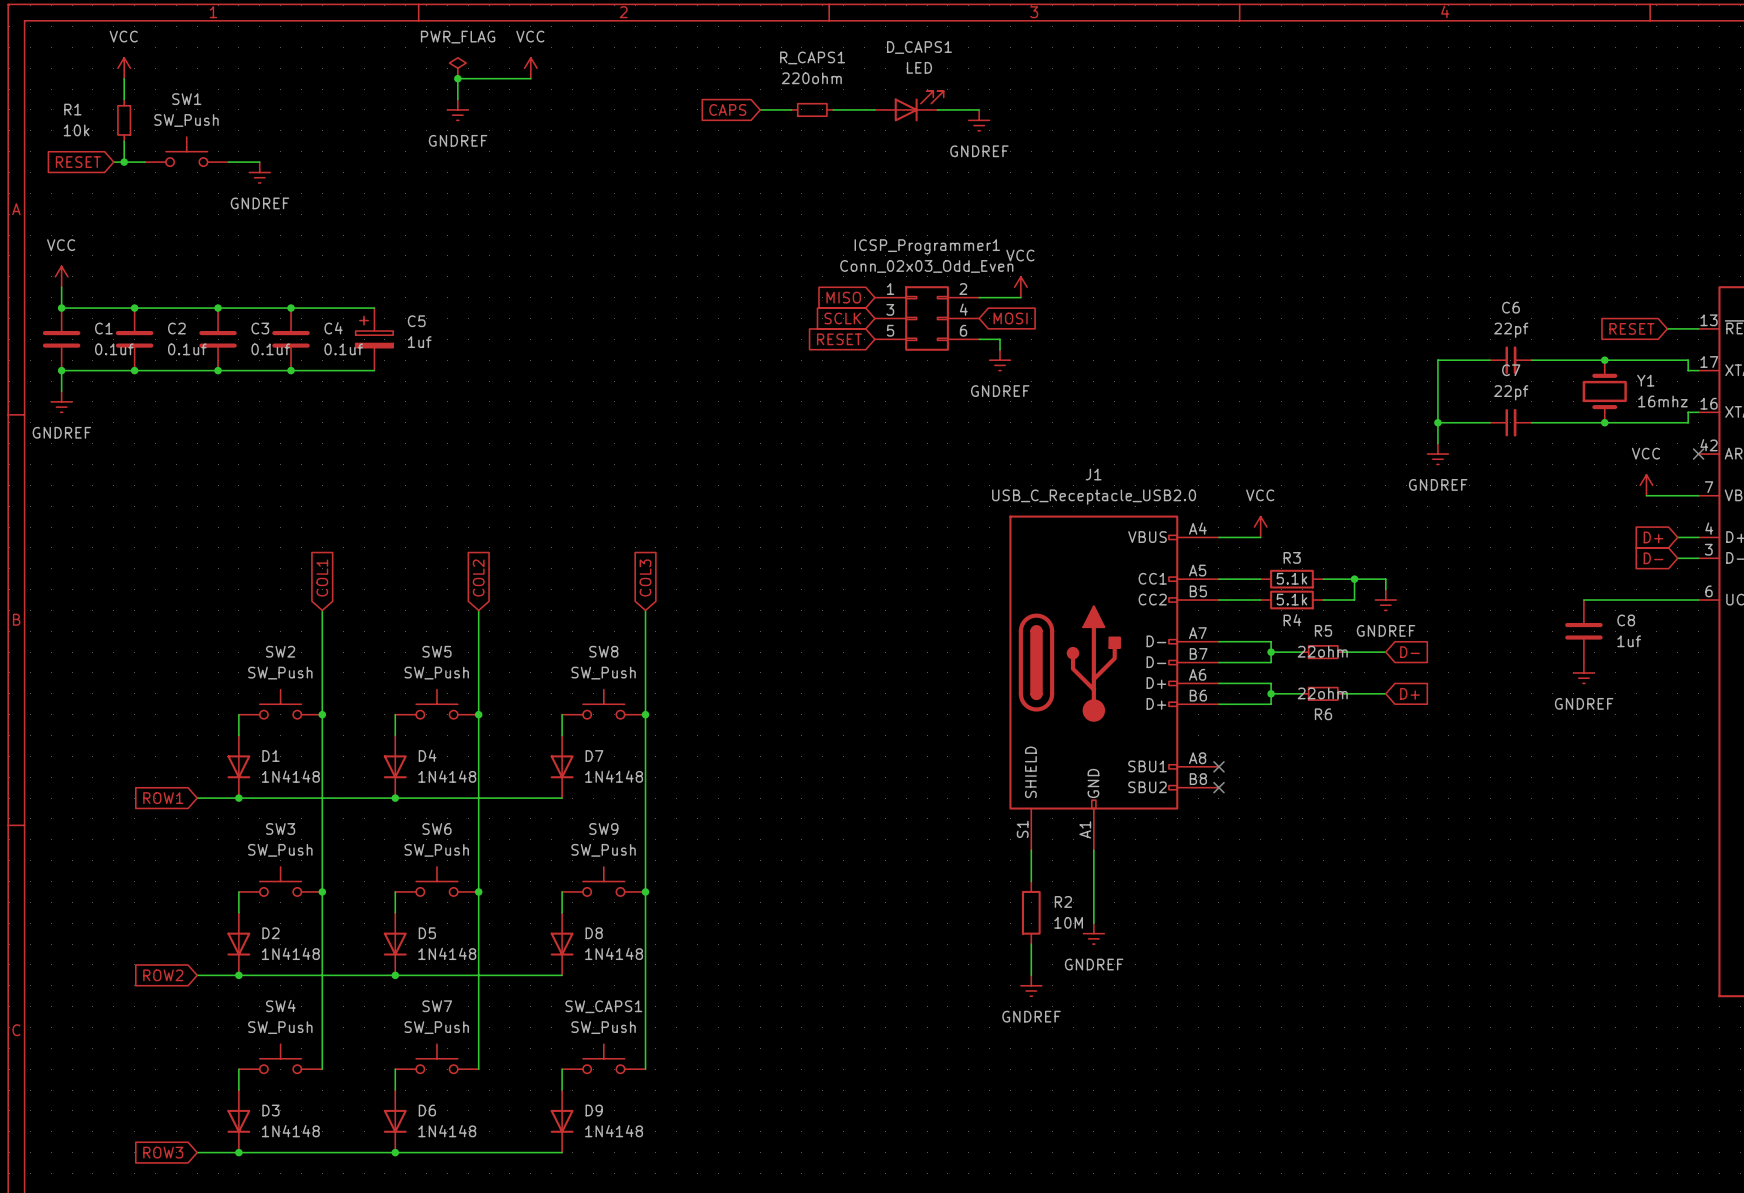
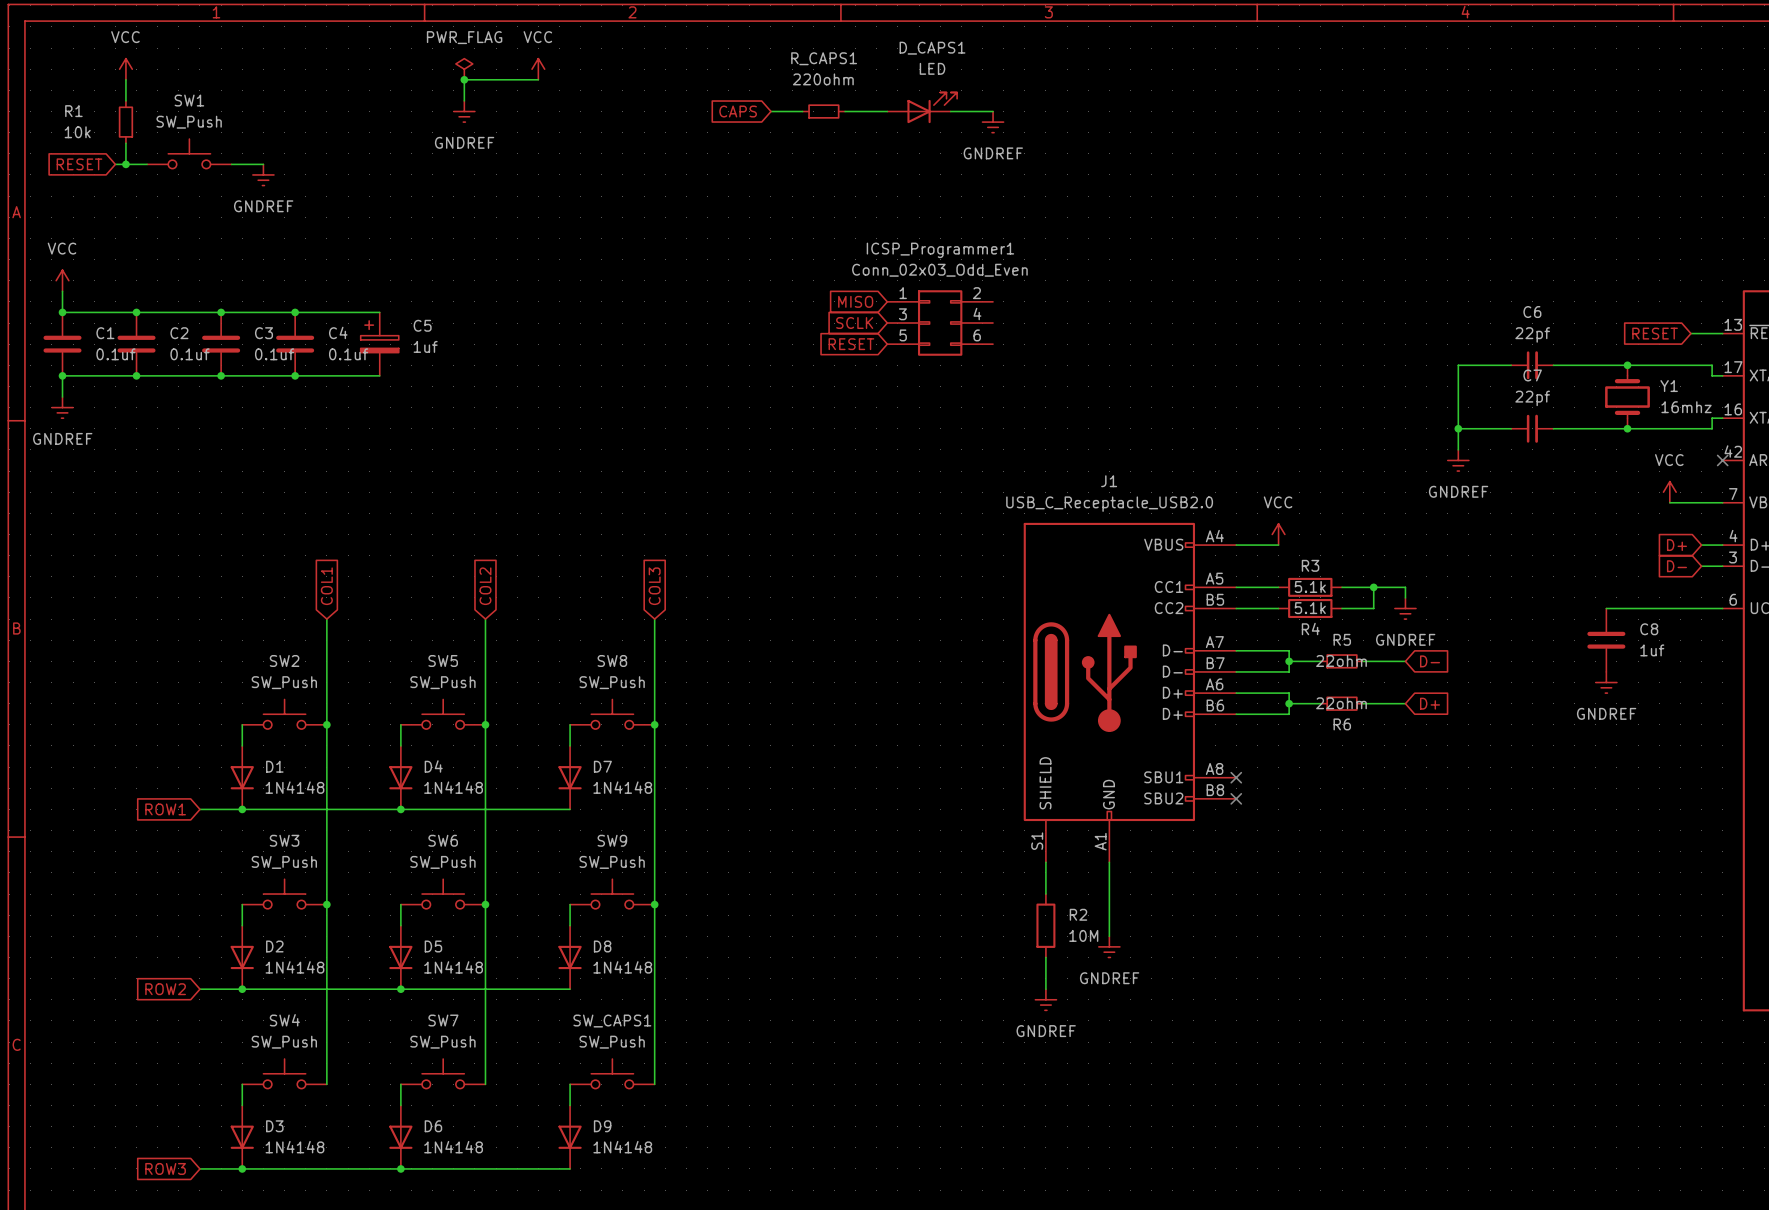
power symbol: VCC (1020, 287) -> none
wire: (979, 297) (1020, 297) -> none
global label: MOSI (1010, 318) -> none
wire: (979, 339) (1000, 339) (1000, 349) -> none
power symbol: GNDREF (1000, 360) -> none

